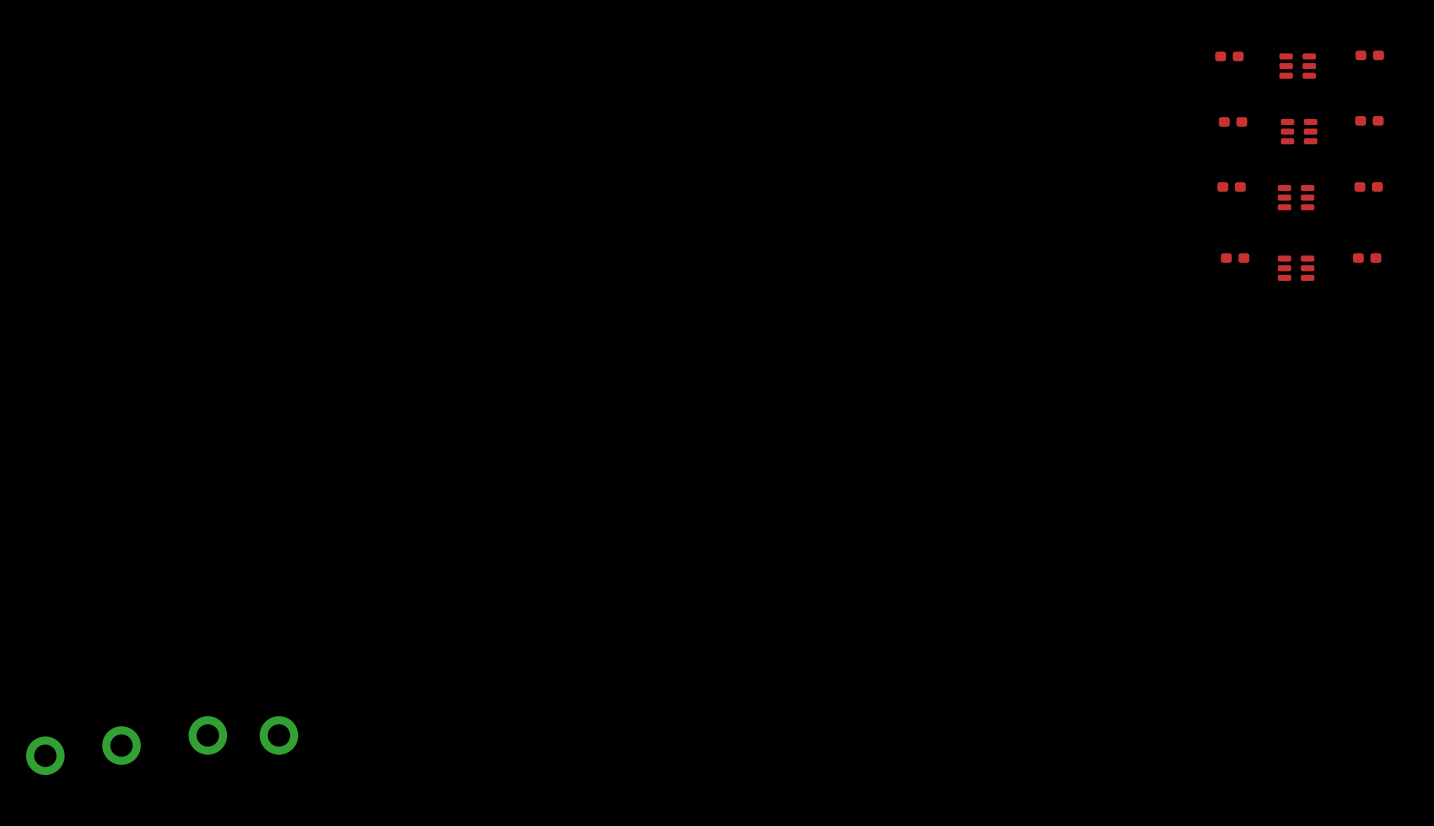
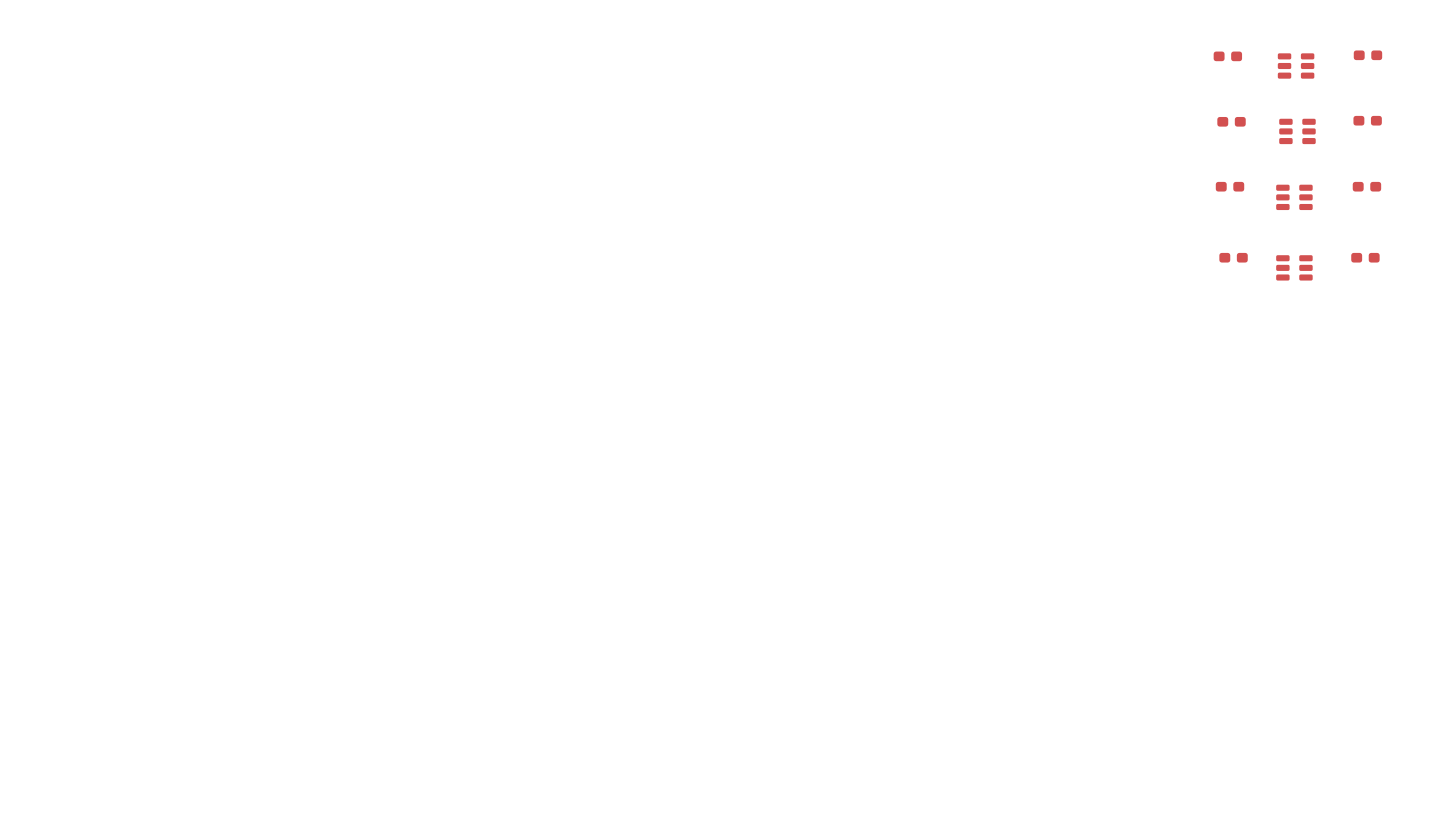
part: (207, 735) -> none
part: (278, 735) -> none
part: (121, 745) -> none
part: (45, 755) -> none

